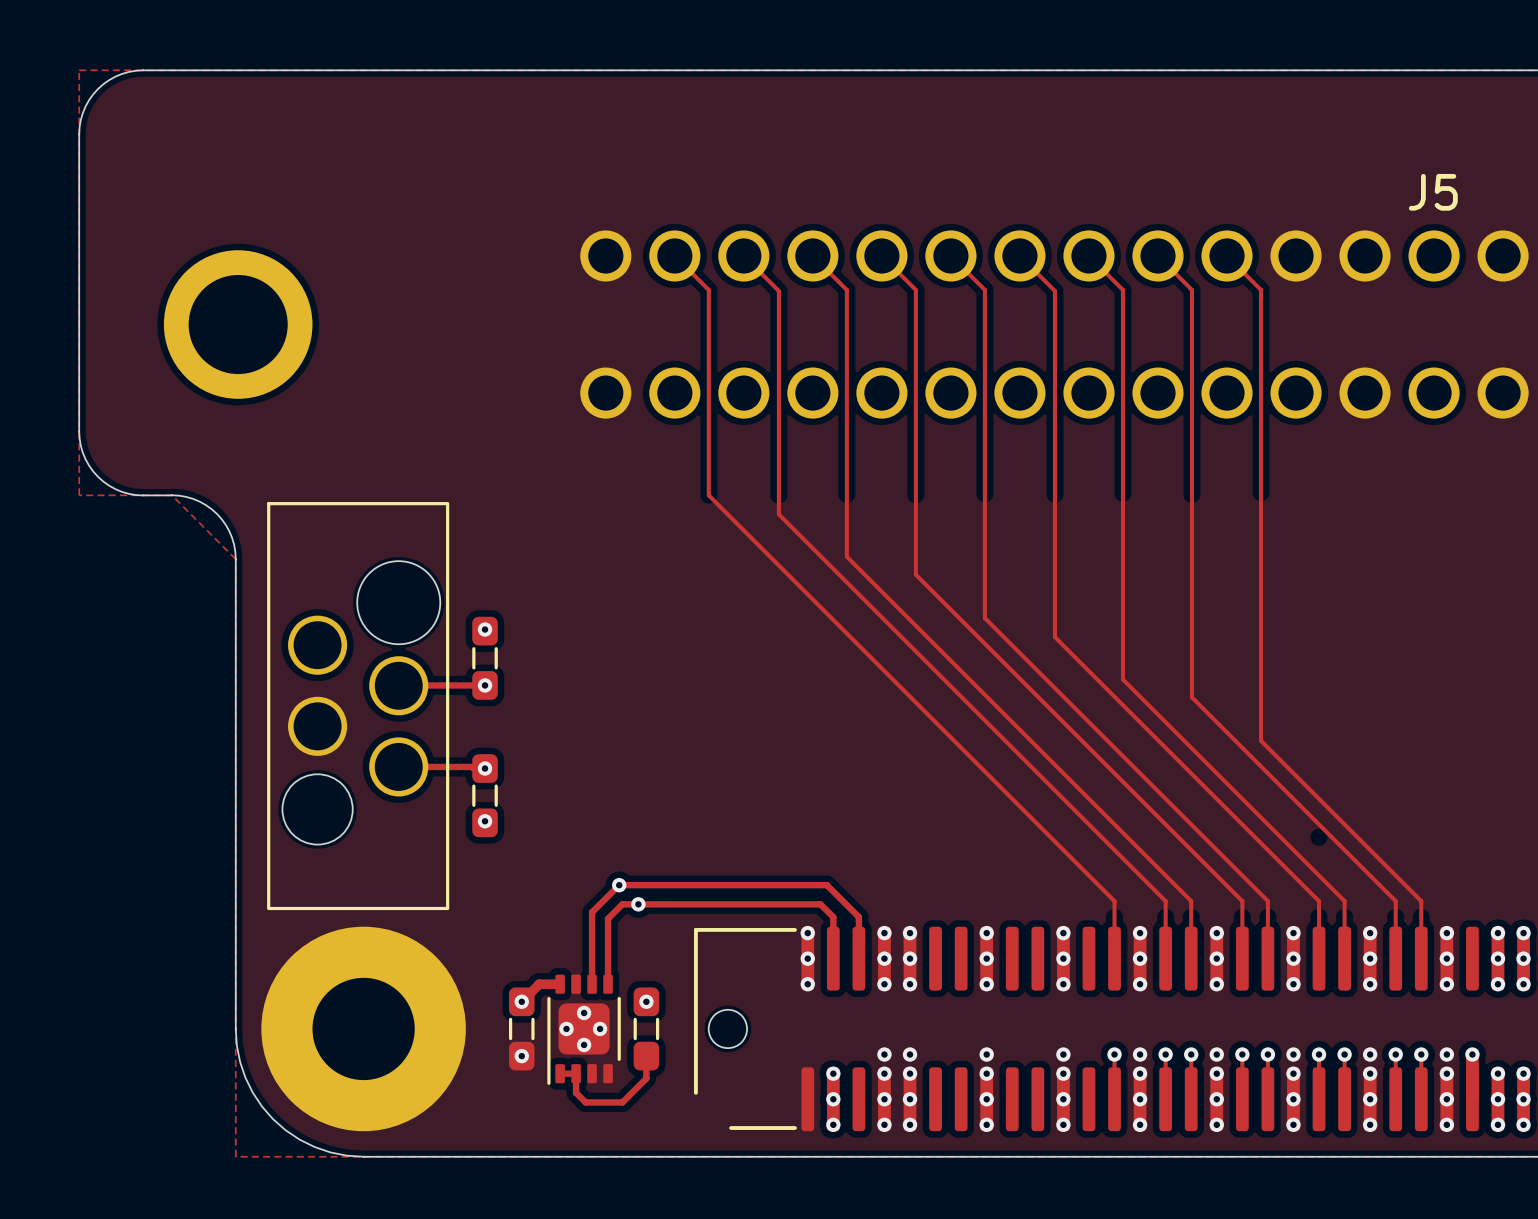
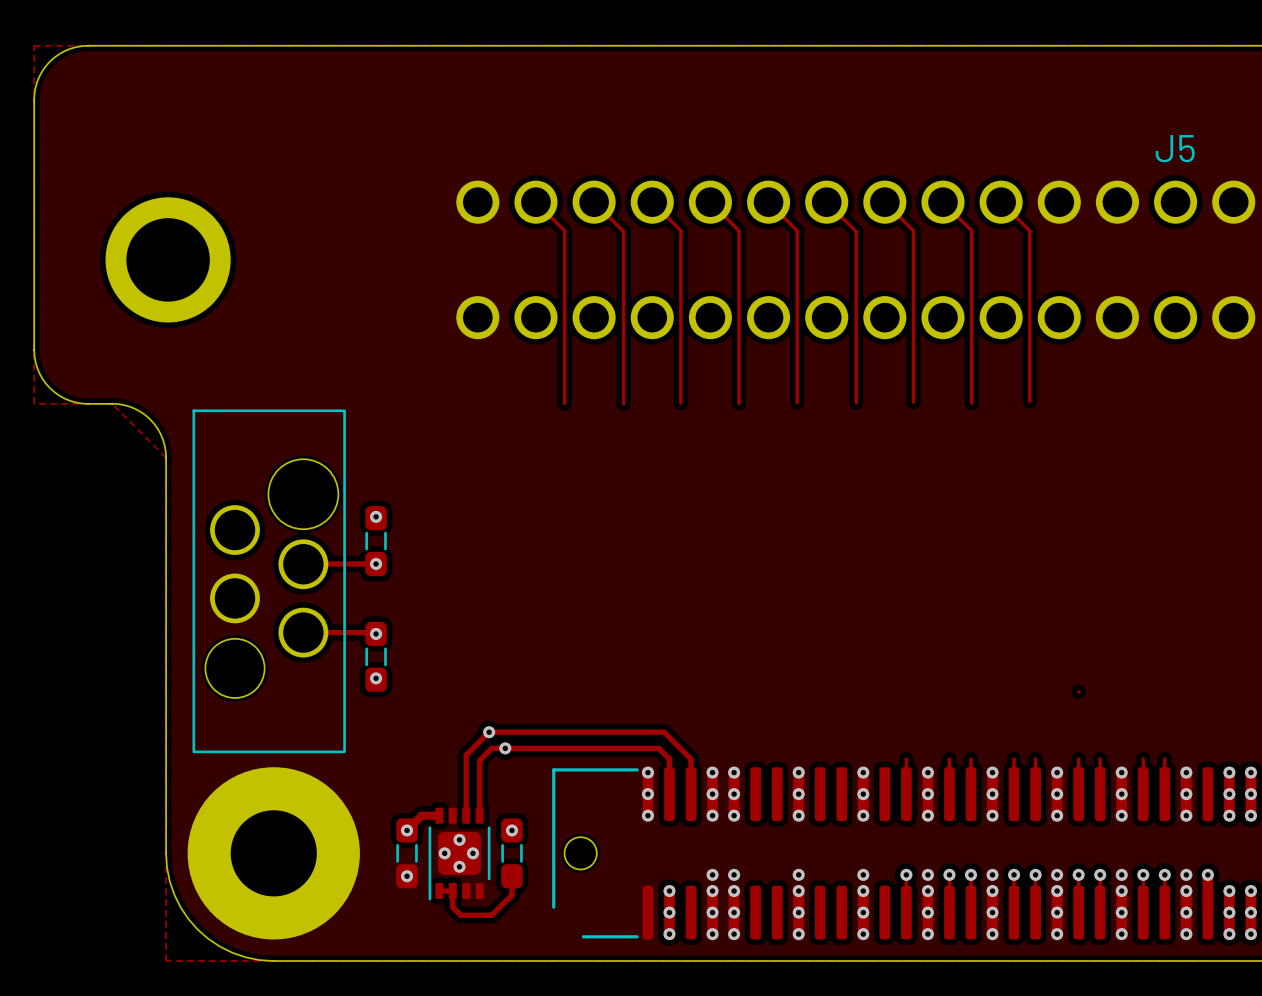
track: (1261, 492) (1261, 740) (1421, 901) (1421, 917) -> none
track: (984, 493) (984, 618) (1267, 901) (1267, 917) -> none
track: (1122, 493) (1122, 679) (1344, 901) (1344, 917) -> none
track: (846, 494) (846, 556) (1191, 901) (1191, 917) -> none
track: (915, 494) (915, 574) (1242, 901) (1242, 917) -> none
track: (1054, 494) (1054, 637) (1319, 901) (1319, 917) -> none
track: (1191, 494) (1191, 697) (1395, 901) (1395, 917) -> none
track: (708, 495) (1114, 901) (1114, 917) -> none
track: (778, 495) (778, 514) (1165, 901) (1165, 917) -> none

